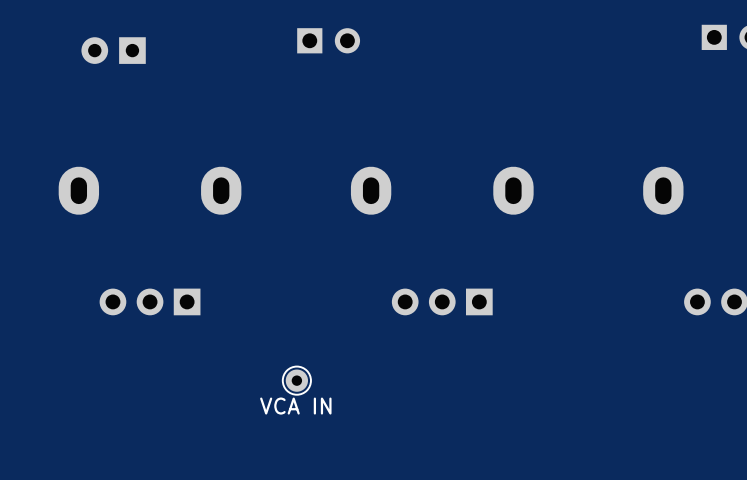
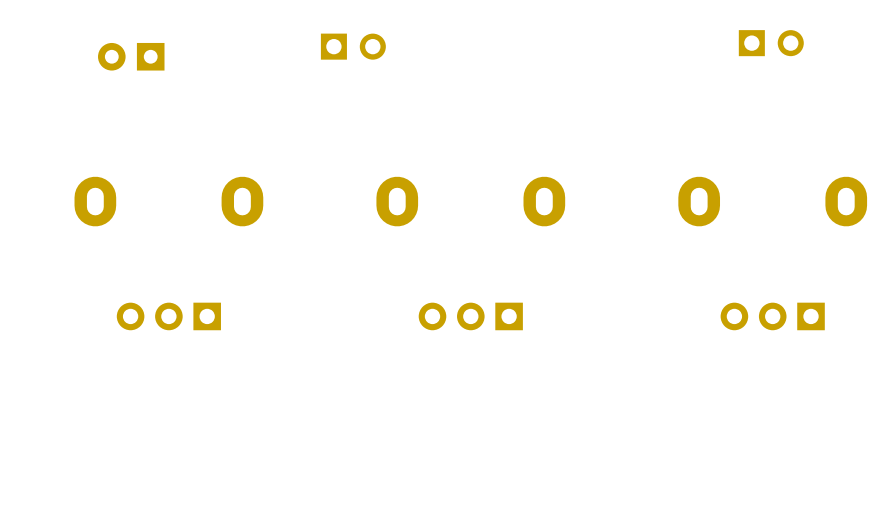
part: VCA IN (296, 380) -> none

